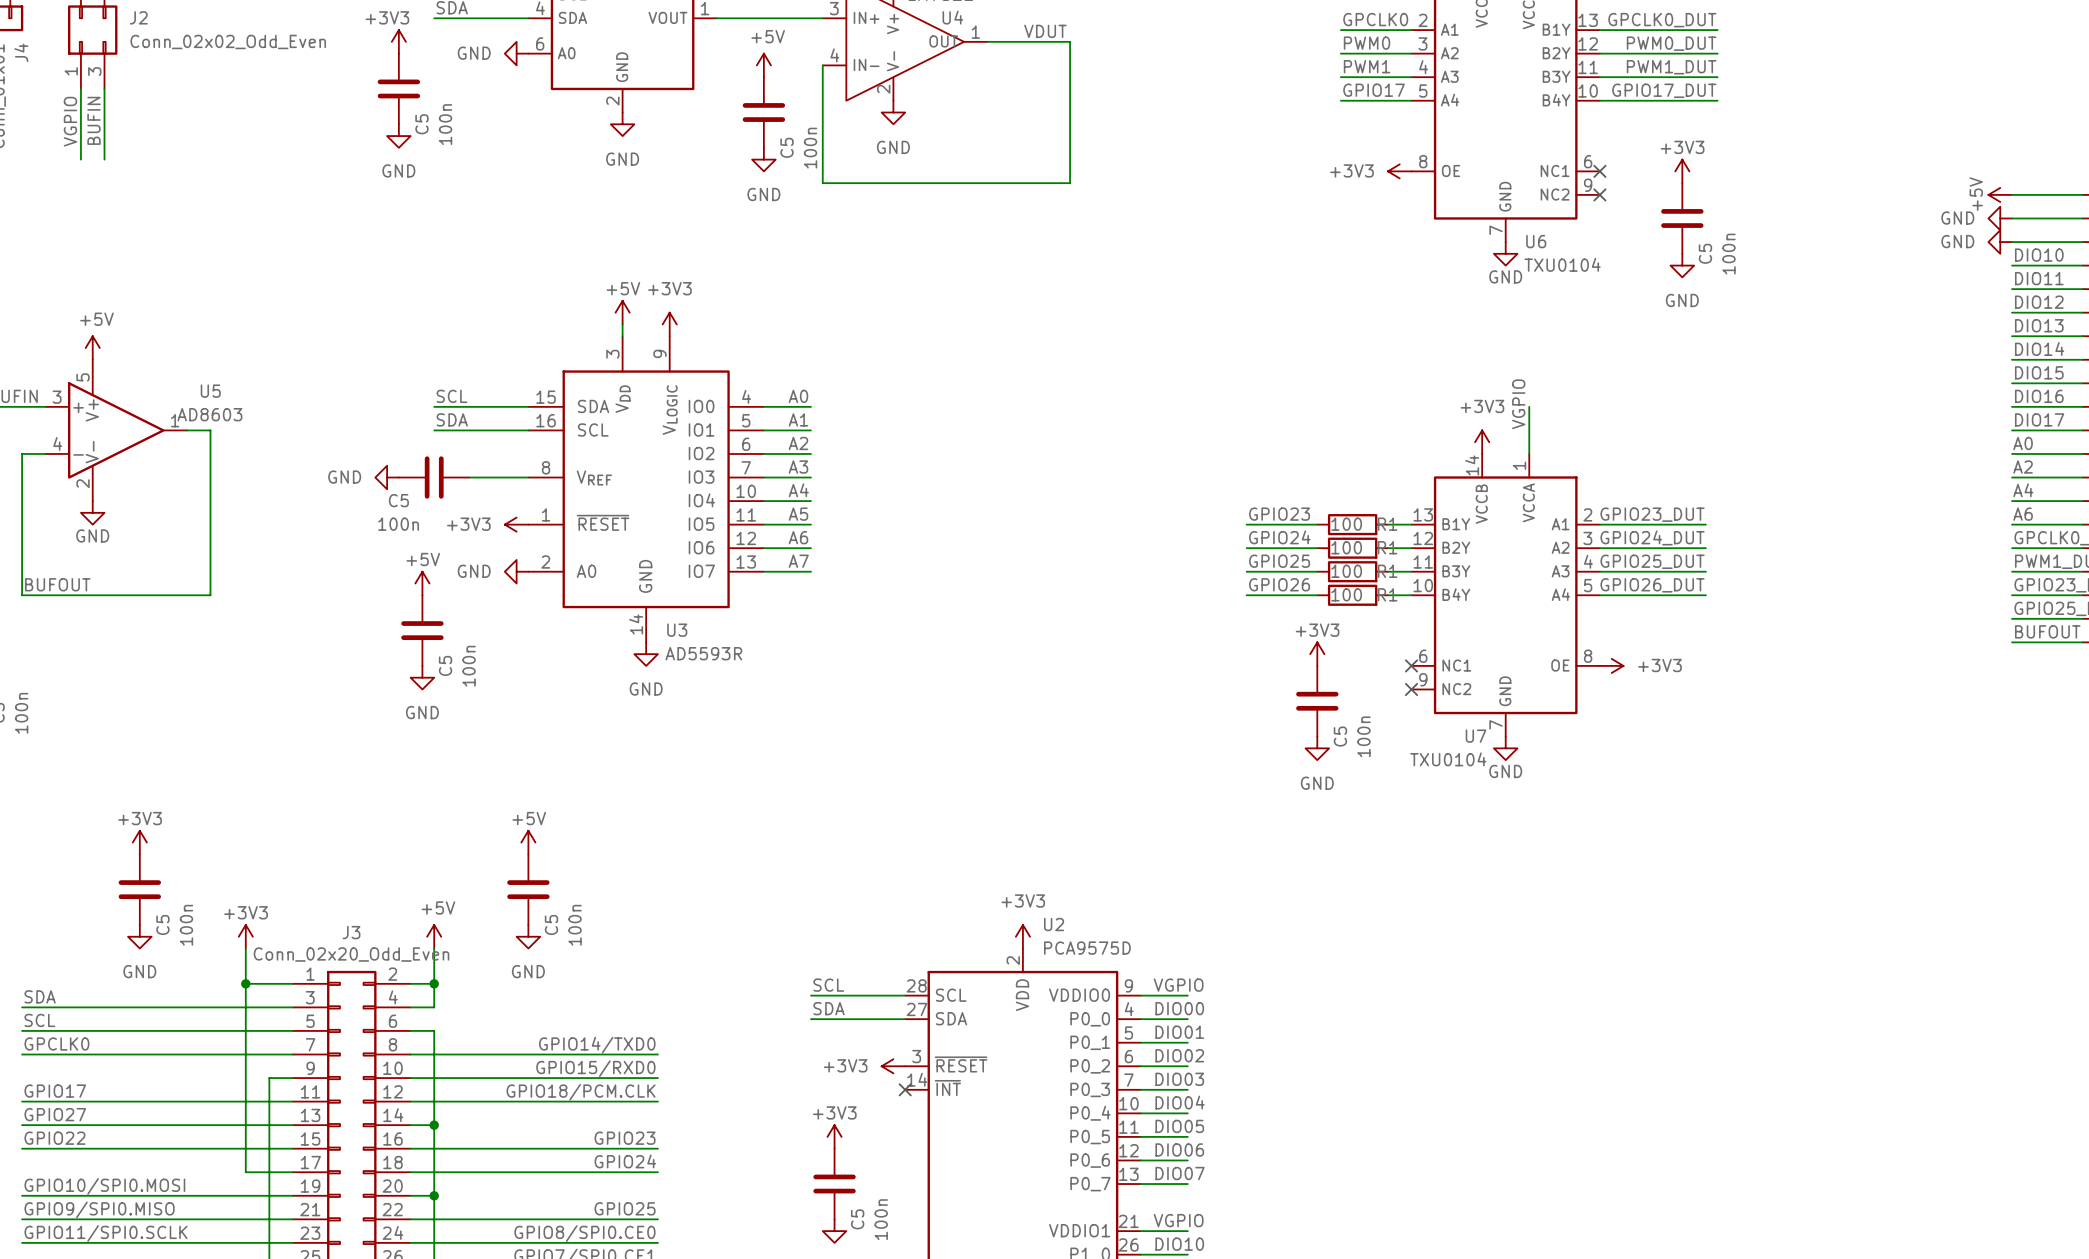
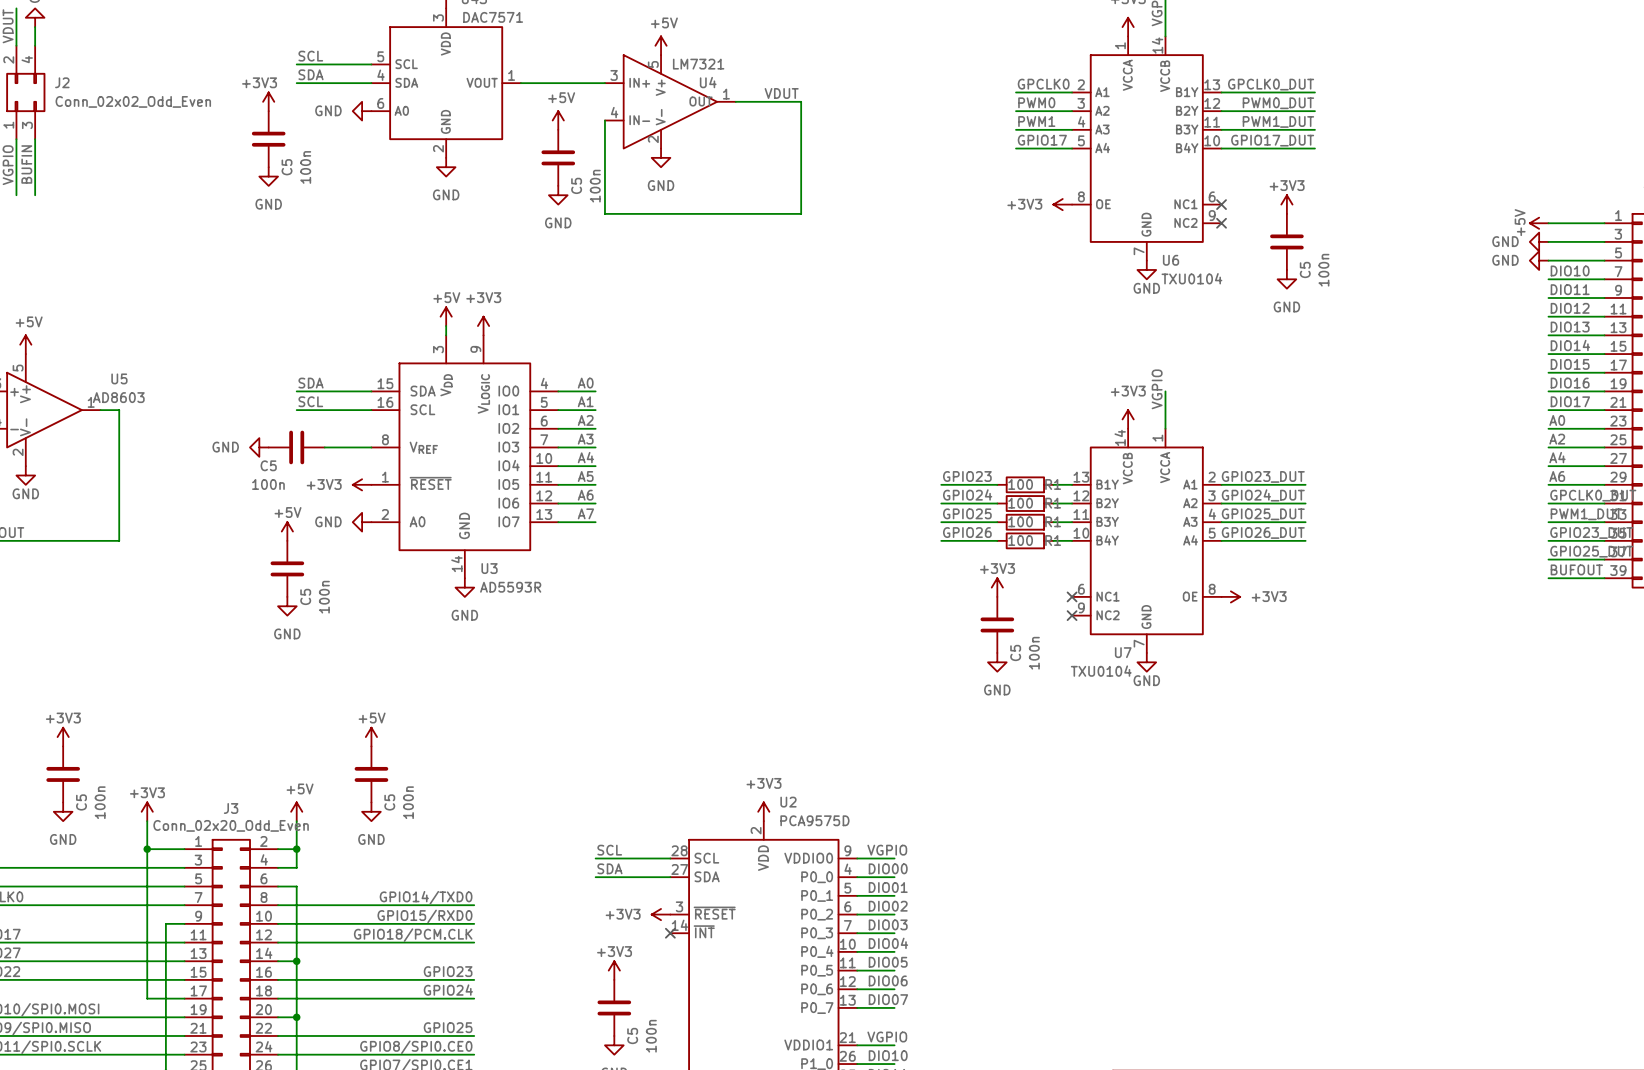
label: SCL (451, 396) -> SDA (311, 383)
label: SDA (452, 419) -> SCL (310, 401)

